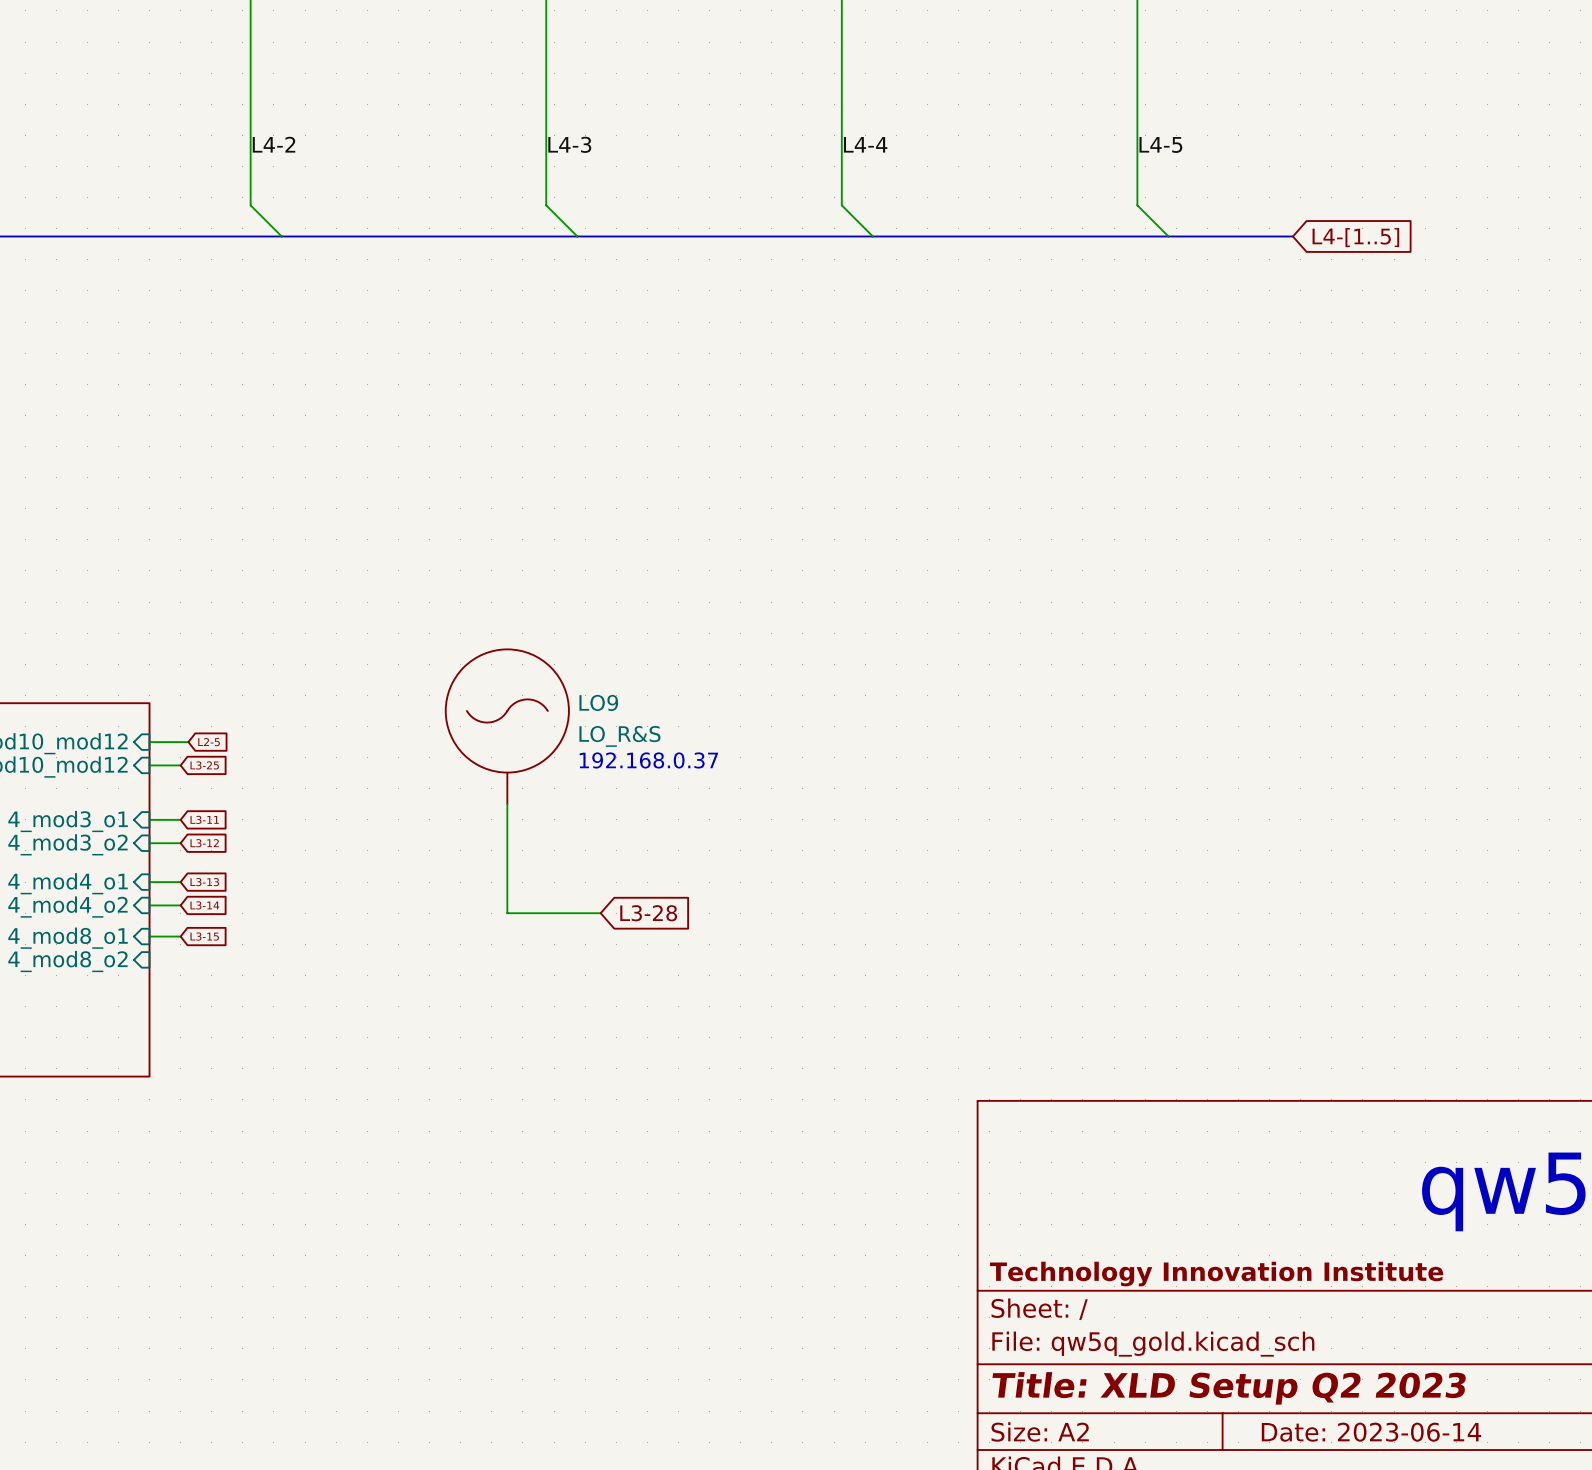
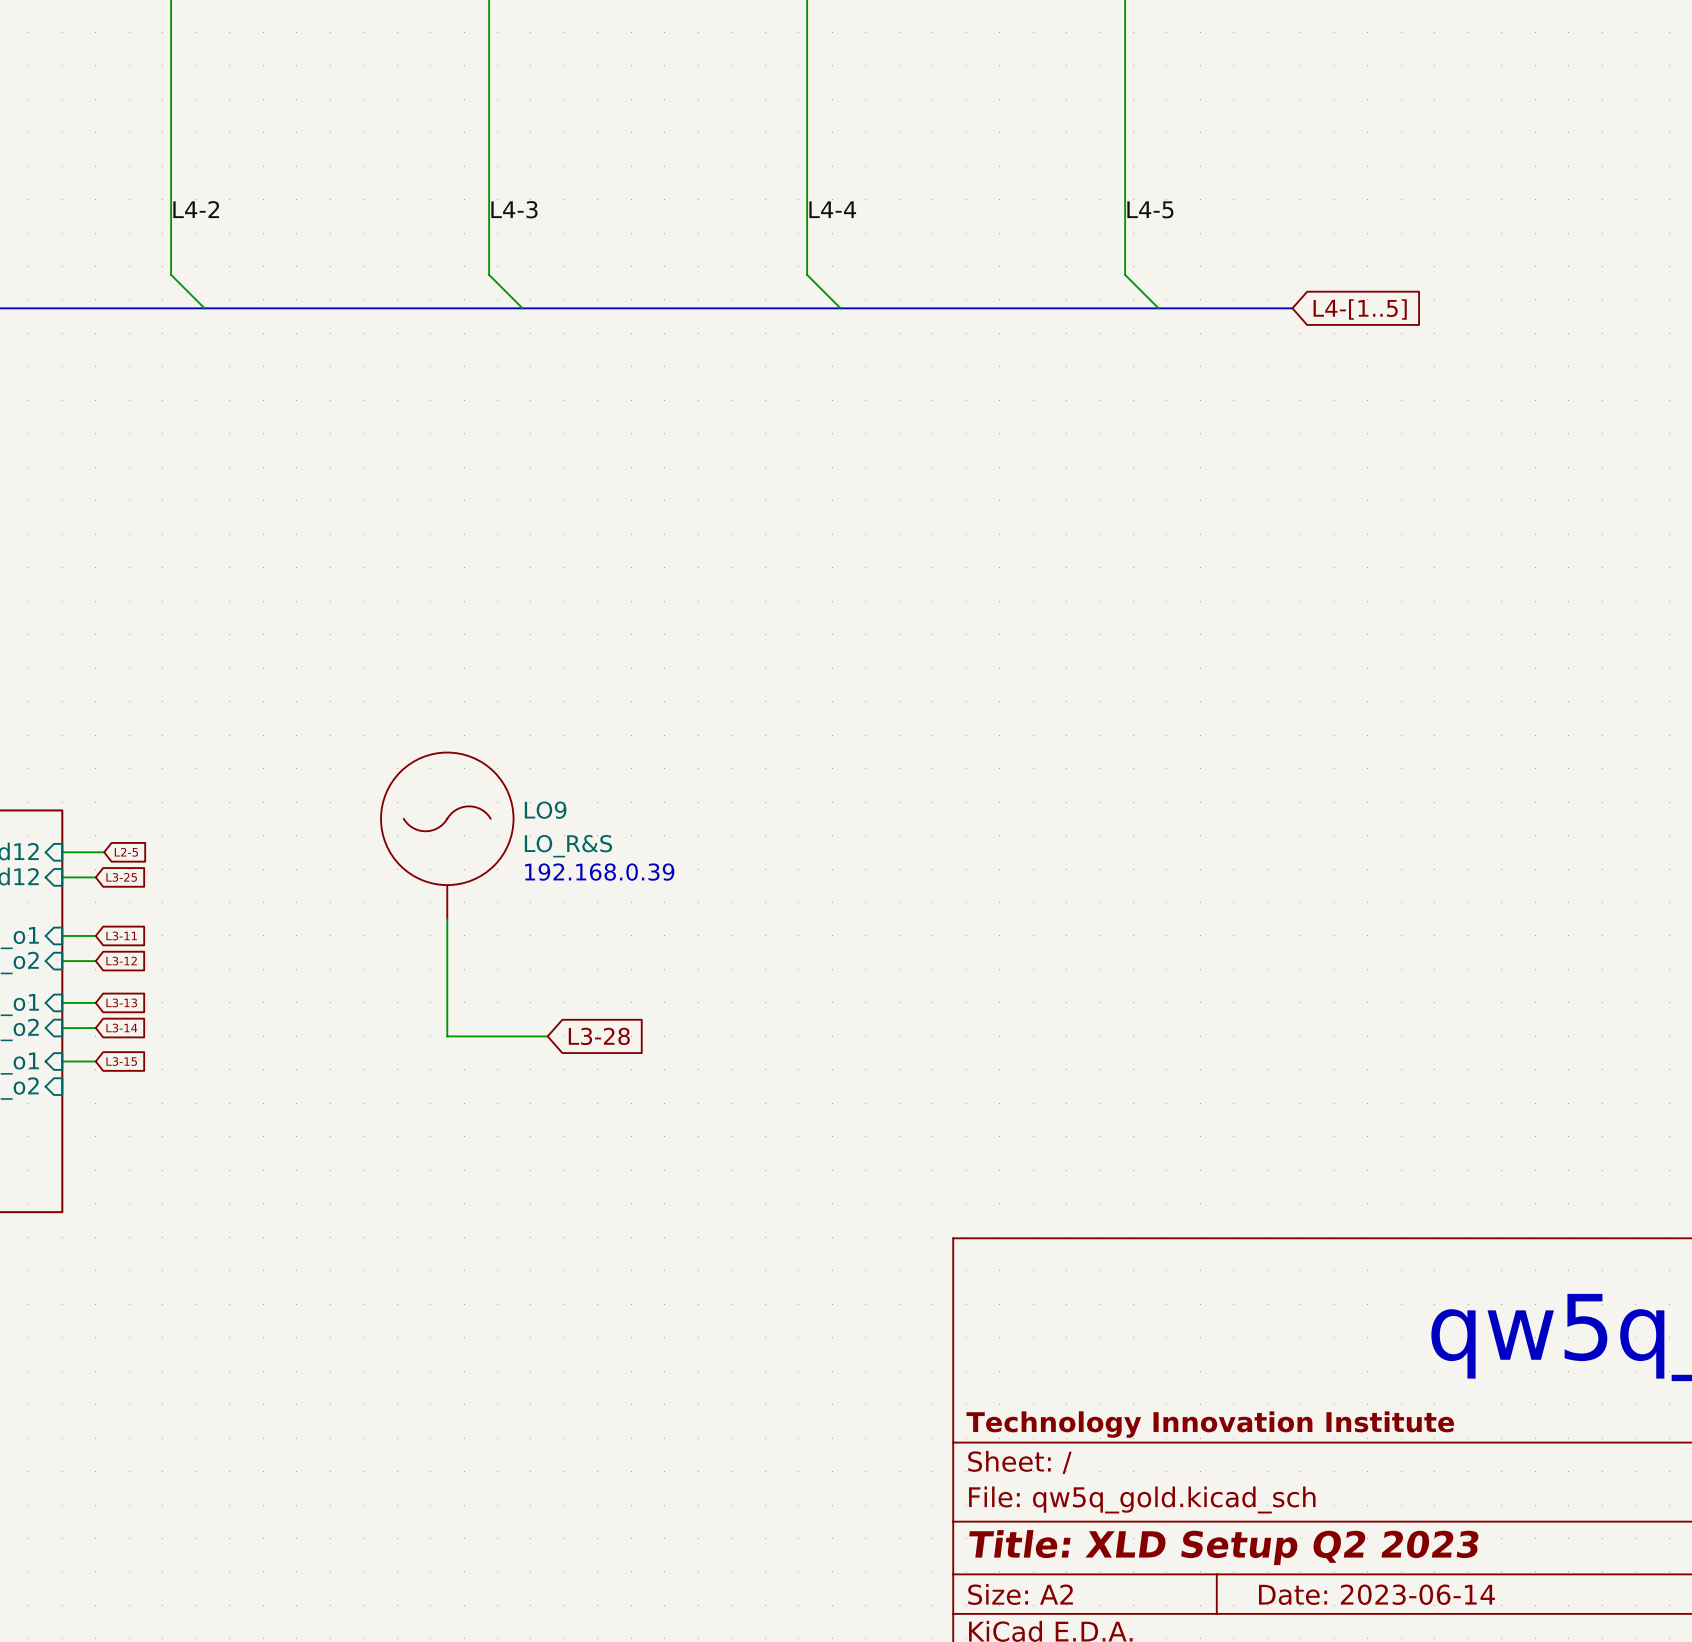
text: 192.168.0.37 (648, 760) -> 192.168.0.39 (599, 872)

